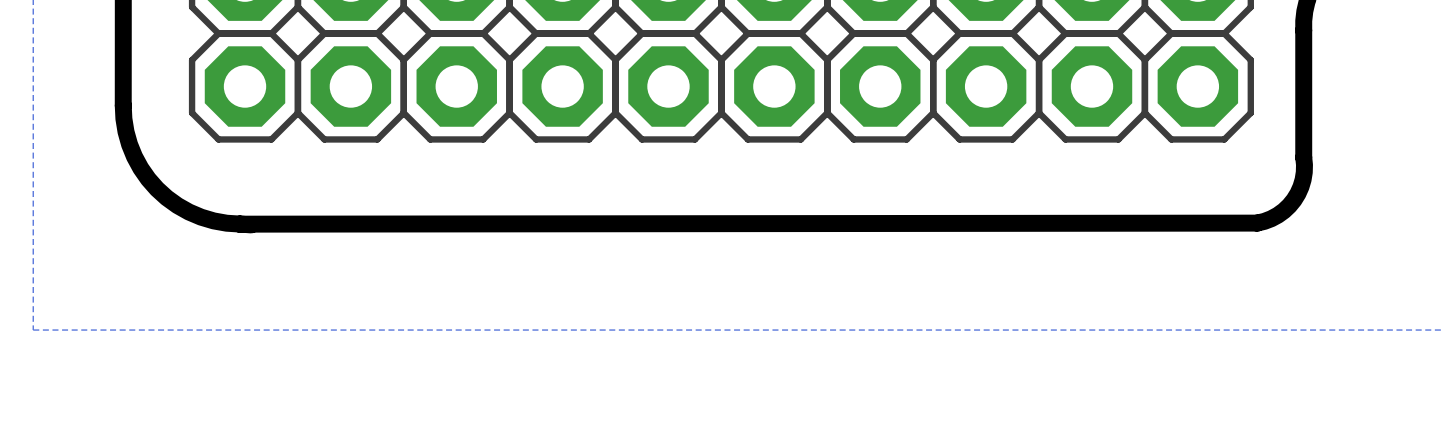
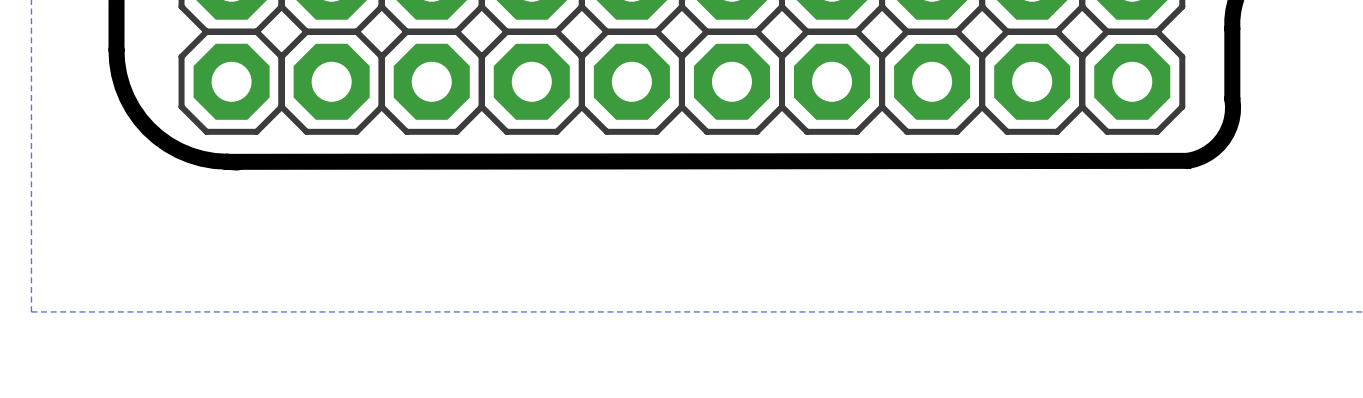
board edge: (123, 52) (123, 105) (126, 131) (134, 156) (148, 179) (166, 197) (189, 212) (213, 220) (251, 224) -> (116, 49) (119, 74) (127, 98) (148, 128) (167, 144) (190, 155) (214, 160) (237, 162)
board edge: (1303, 104) (1304, 172) (1300, 186) (1294, 199) (1283, 210) (1271, 218) (1257, 223) (239, 224) -> (1232, 98) (1231, 119) (1223, 138) (1207, 153) (1188, 160) (226, 161)

